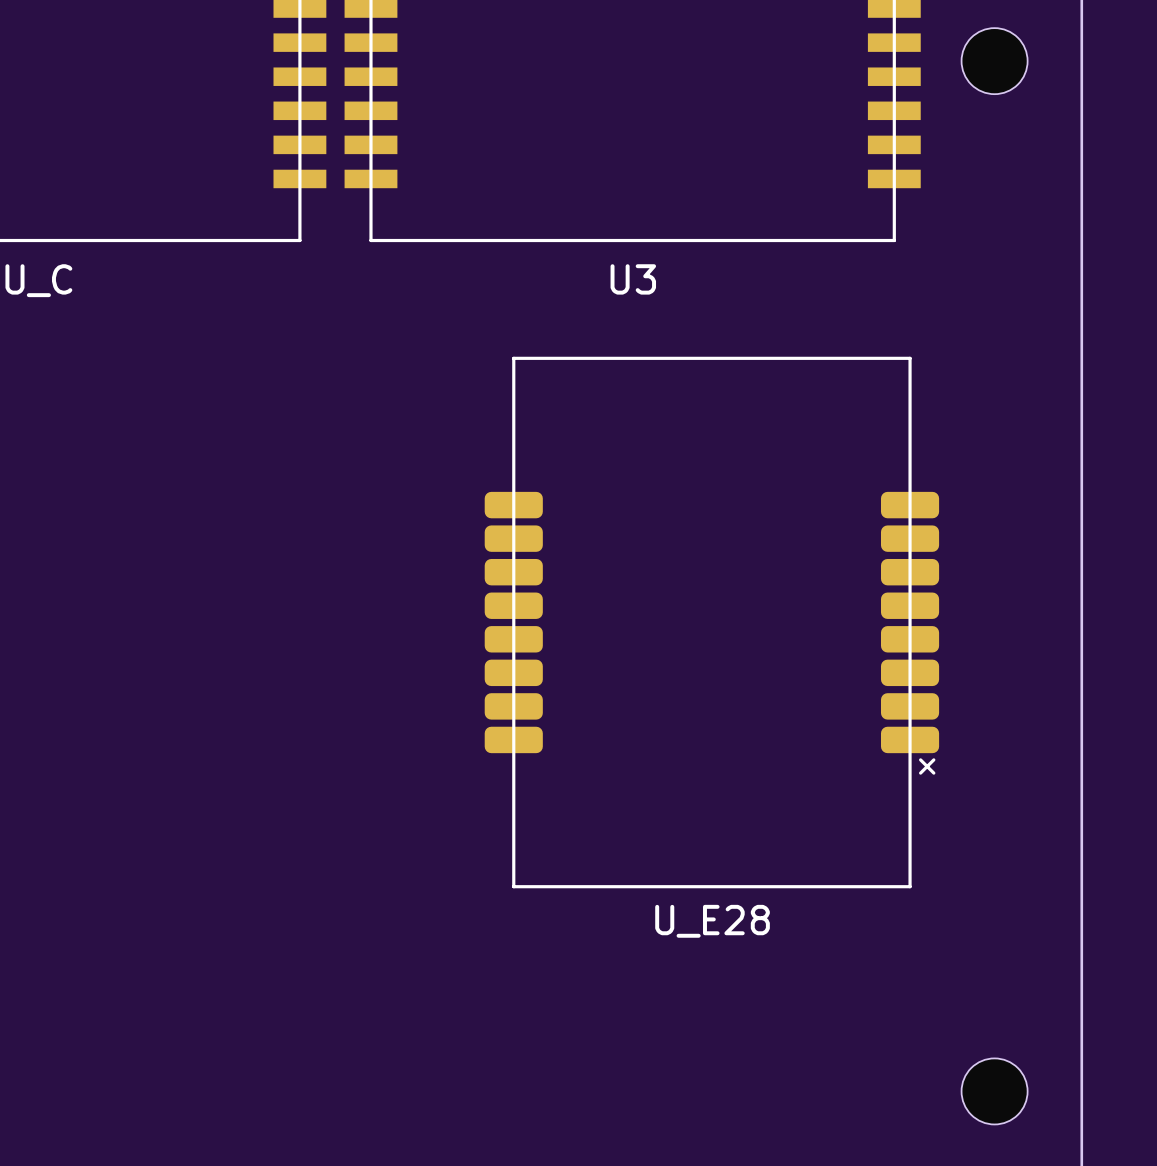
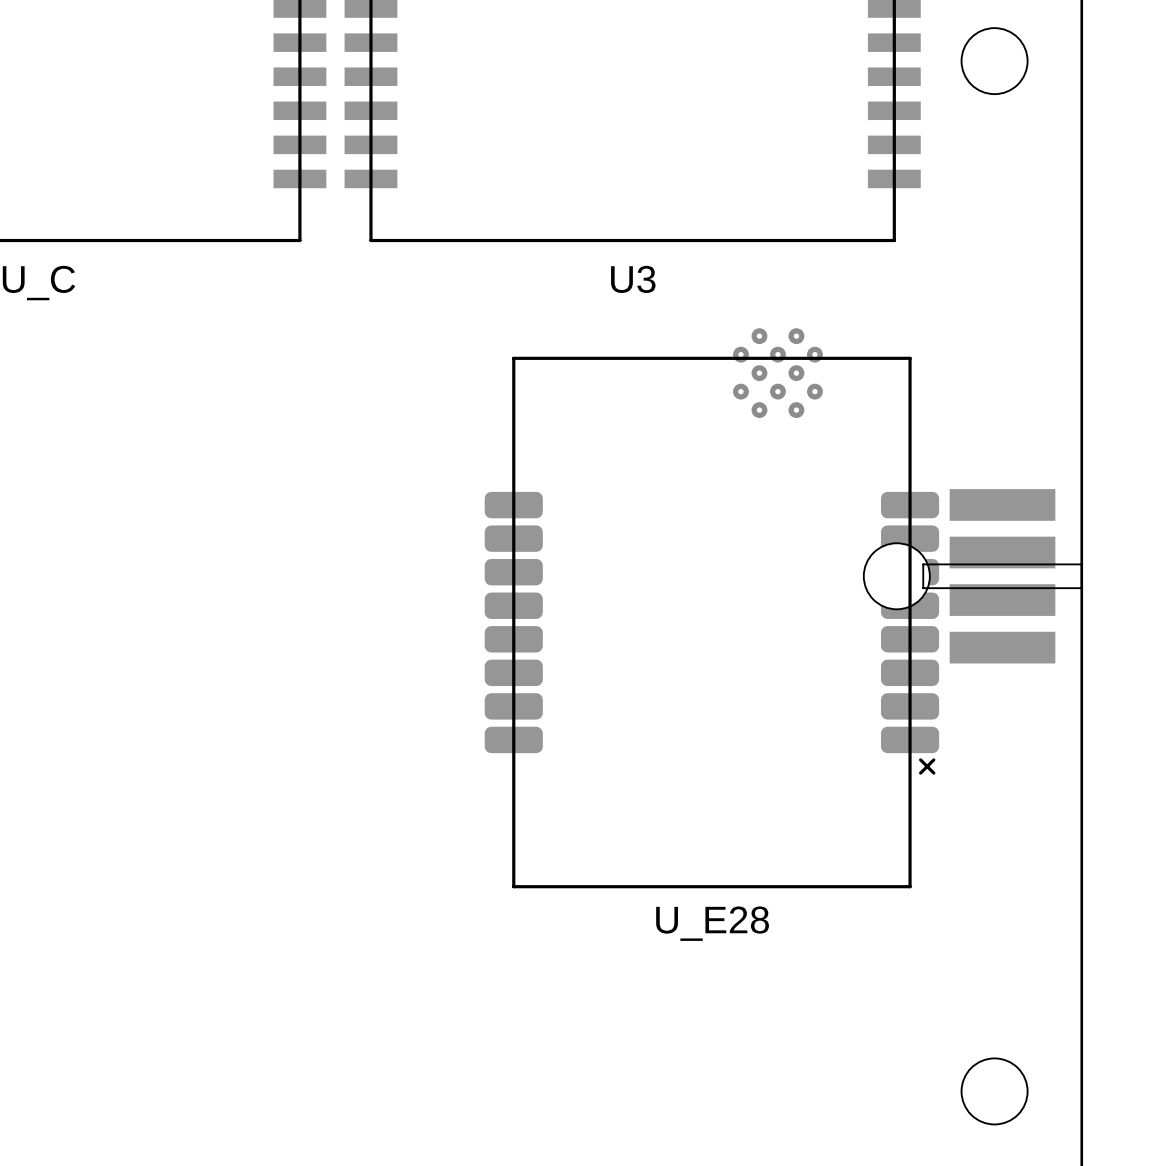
part: none -> (777, 373)
part: none -> (896, 576)
part: none -> (1002, 576)

